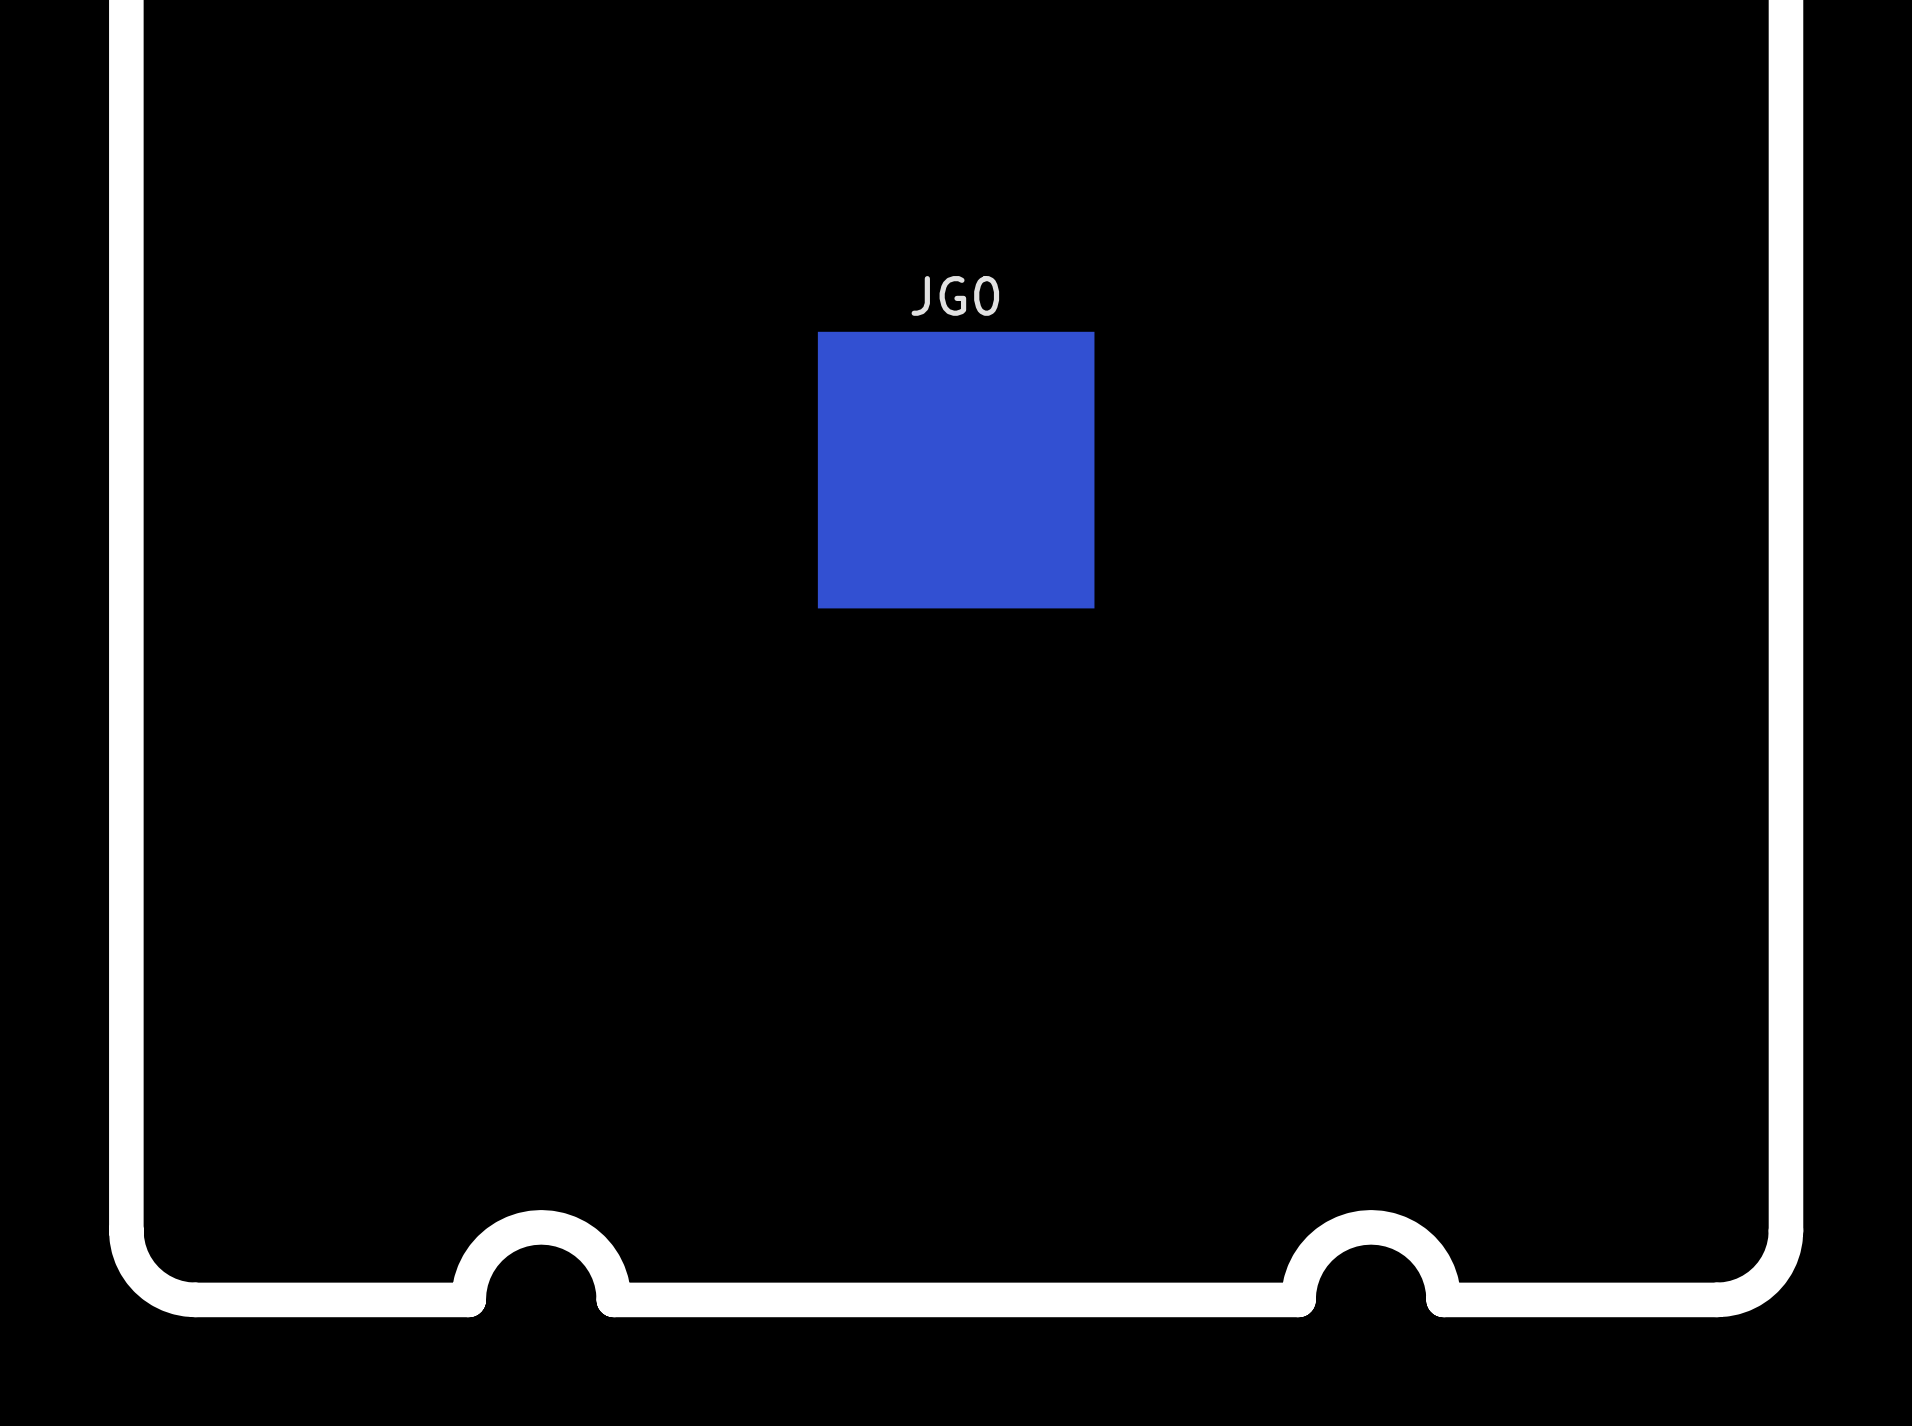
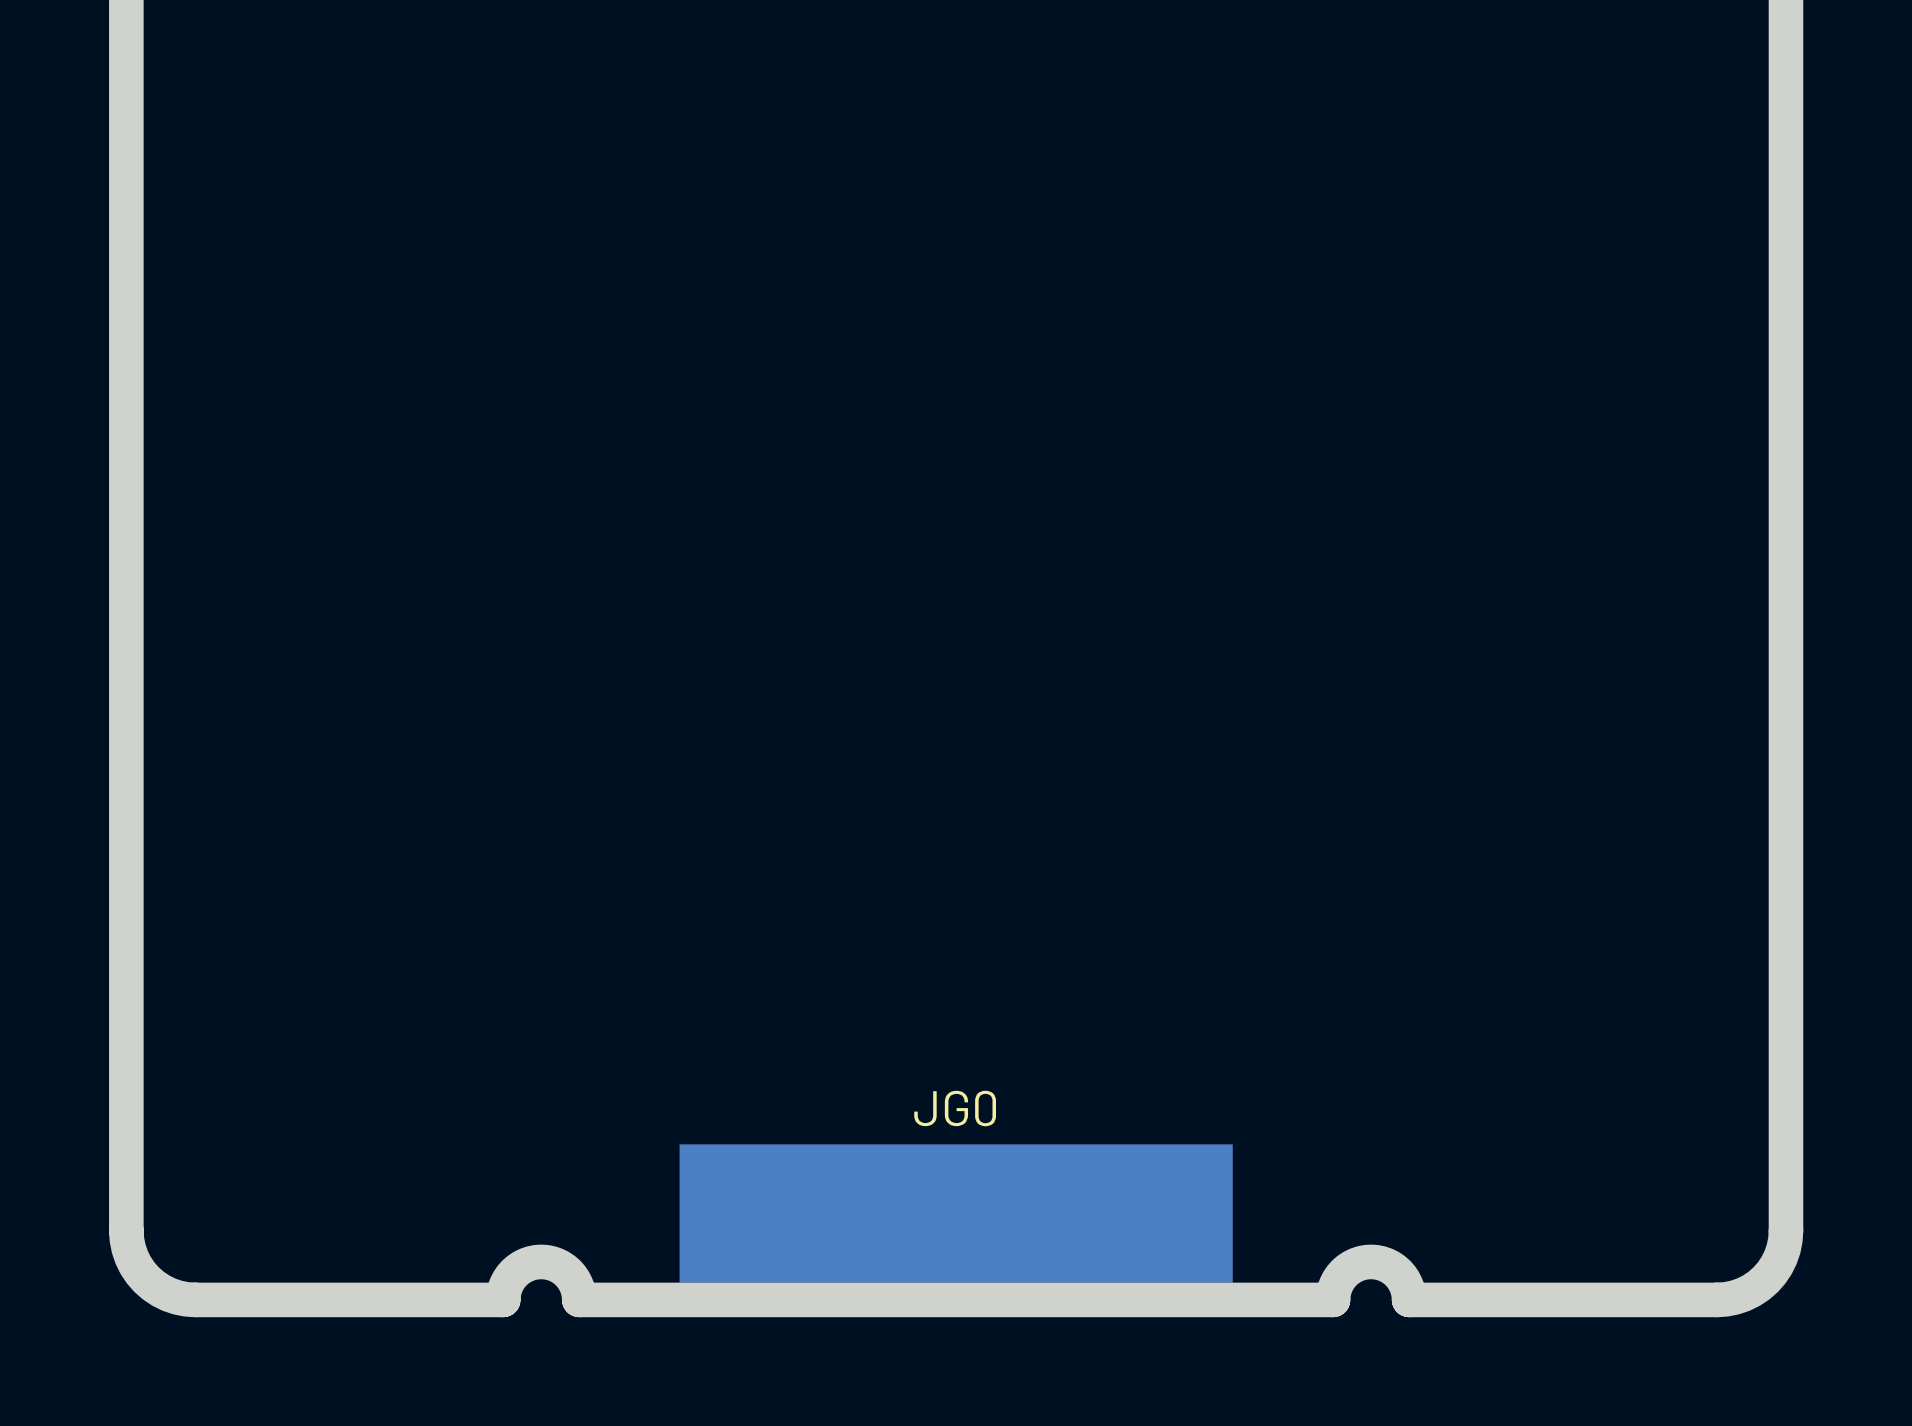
JG0 footprint: [817, 331, 1095, 609] -> [679, 1144, 1233, 1283]
board edge: (613, 1299) (608, 1272) (592, 1248) (569, 1232) (541, 1227) (513, 1232) (489, 1248) (474, 1272) (468, 1299) -> (613, 1299) (579, 1299) (576, 1285) (568, 1273) (555, 1264) (541, 1261) (526, 1264) (514, 1273) (506, 1285) (503, 1299) (468, 1299)
board edge: (1443, 1299) (1438, 1272) (1422, 1248) (1398, 1232) (1371, 1227) (1343, 1232) (1319, 1248) (1303, 1272) (1298, 1299) -> (1443, 1299) (1409, 1299) (1406, 1285) (1397, 1273) (1385, 1264) (1371, 1261) (1356, 1264) (1344, 1273) (1335, 1285) (1333, 1299) (1298, 1299)

